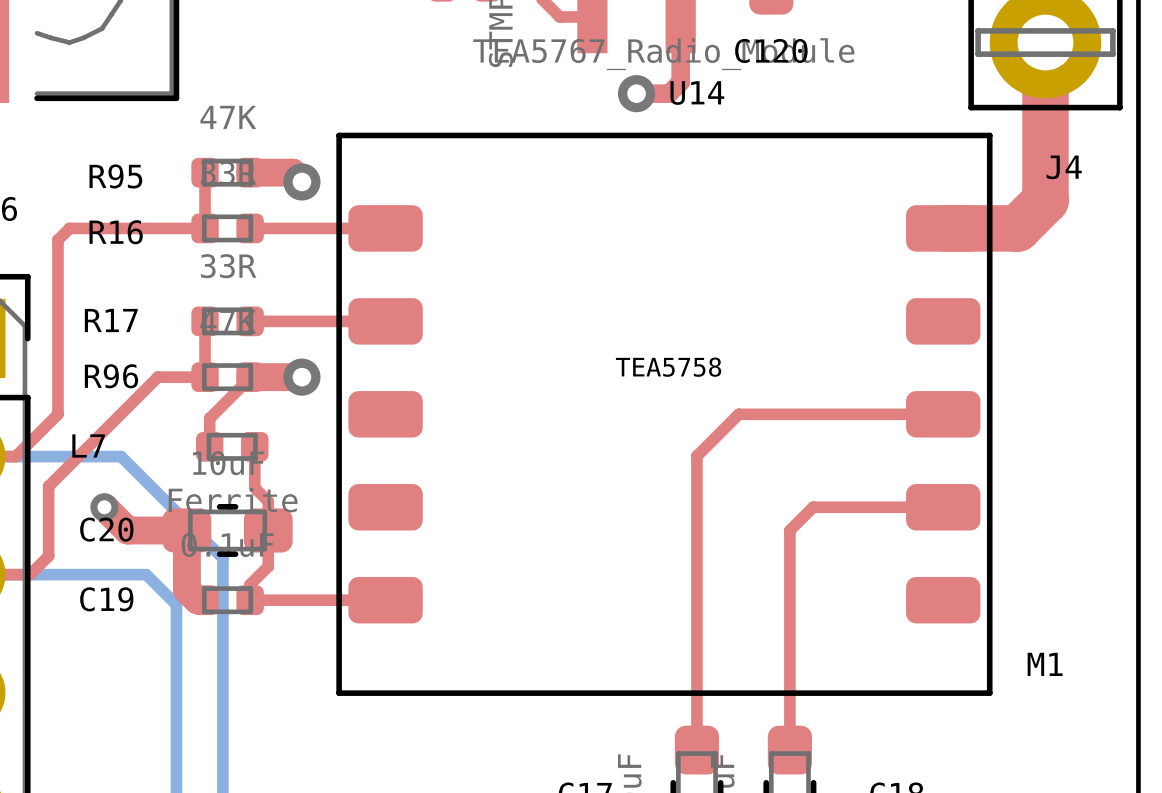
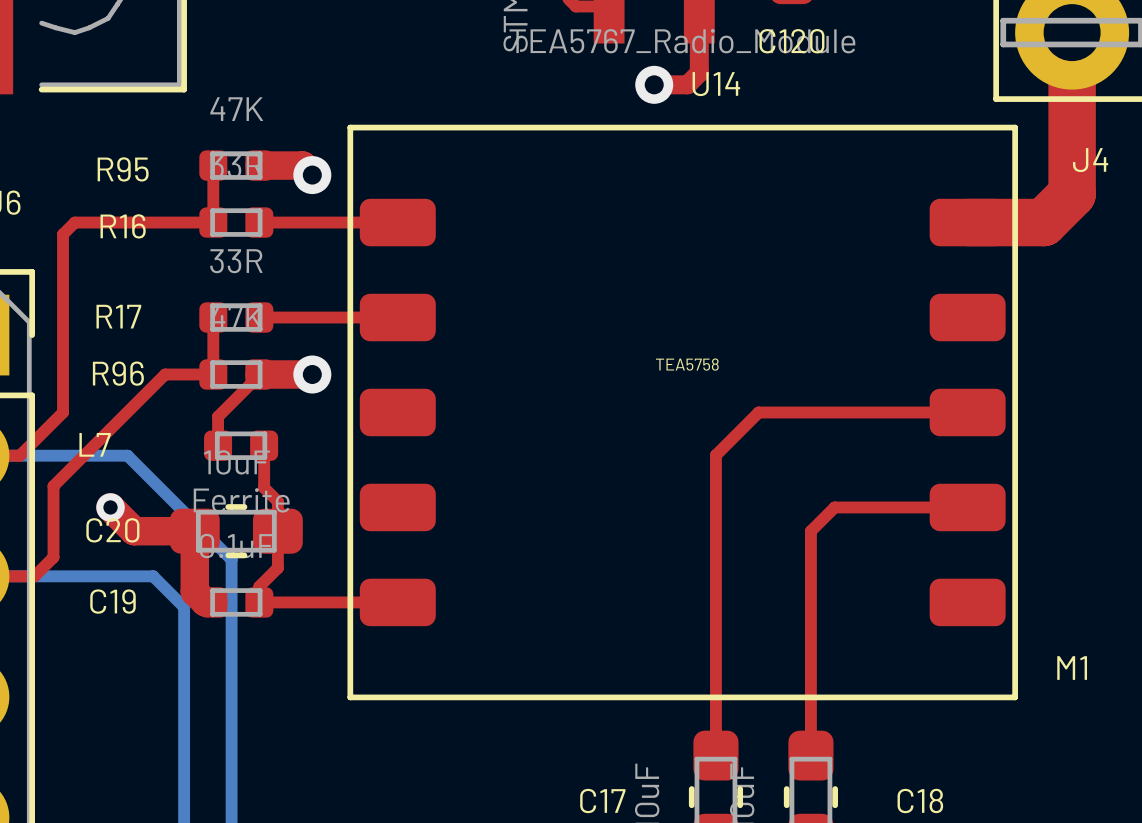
M1 footprint: [336, 132, 993, 696] -> [347, 124, 1018, 701]

